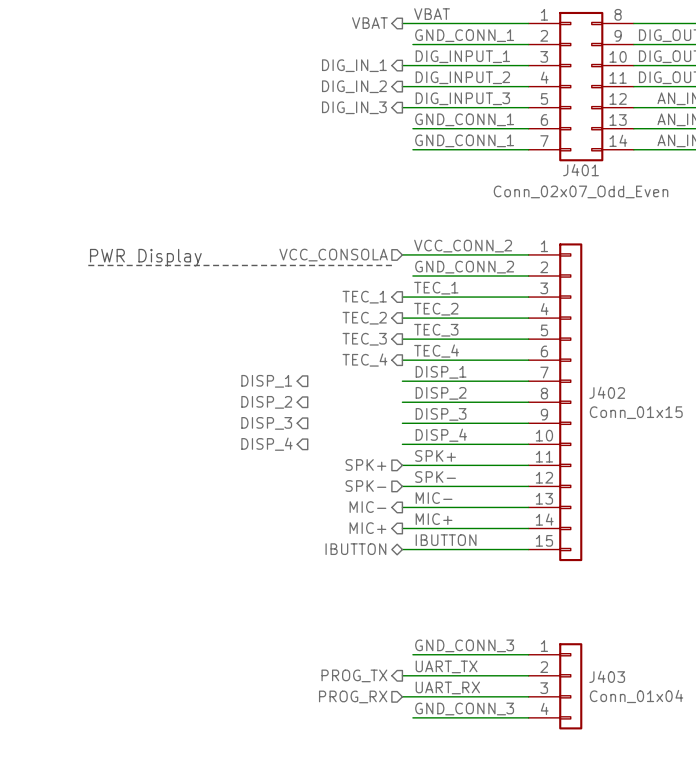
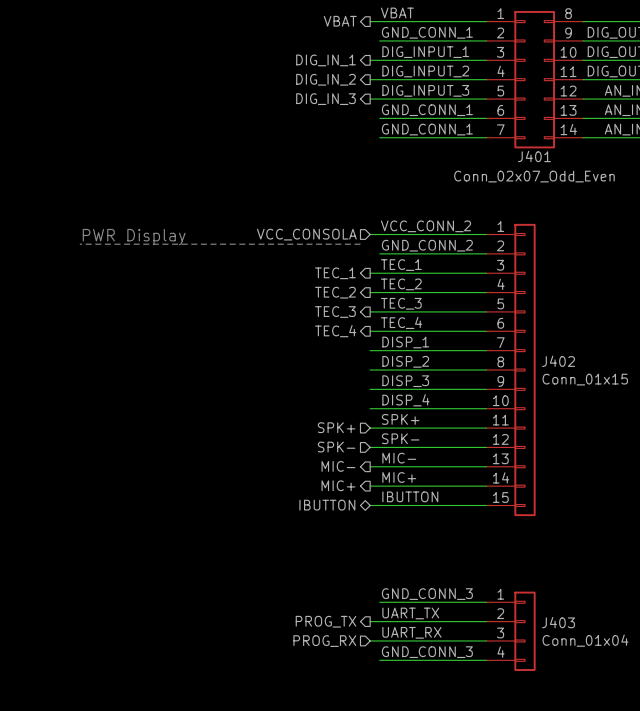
hierarchical label: DISP_1 (266, 381) -> none
hierarchical label: DISP_2 (266, 402) -> none
hierarchical label: DISP_3 (266, 423) -> none
hierarchical label: DISP_4 (266, 444) -> none

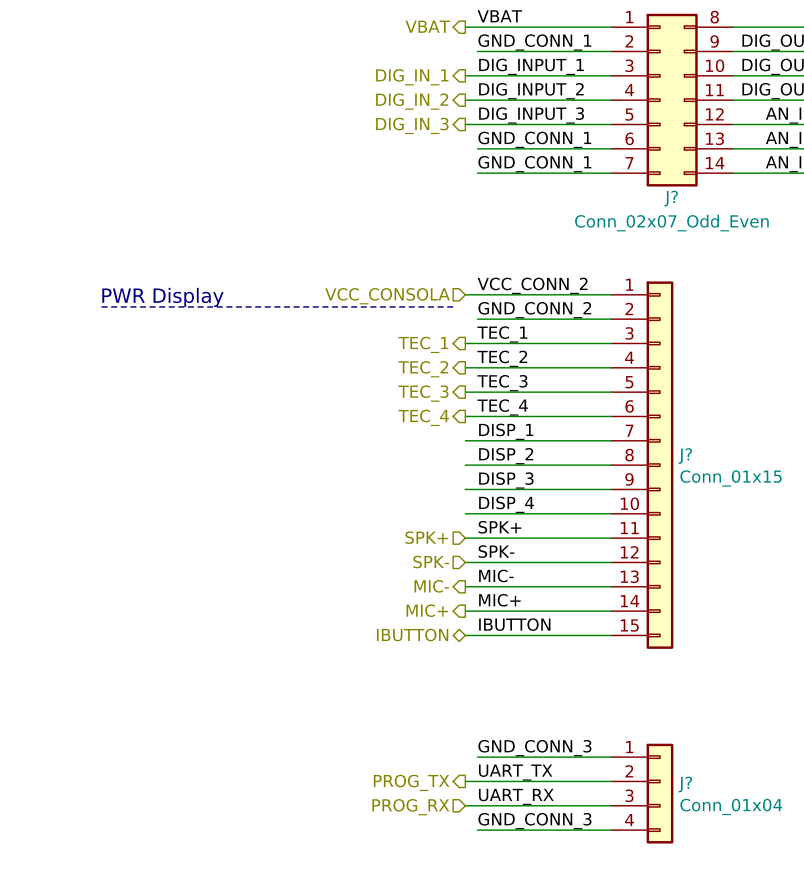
J401 name: J401 (534, 156) -> J? (671, 198)
J402 name: J402 (558, 361) -> J? (685, 456)
J403 name: J403 (558, 622) -> J? (685, 784)

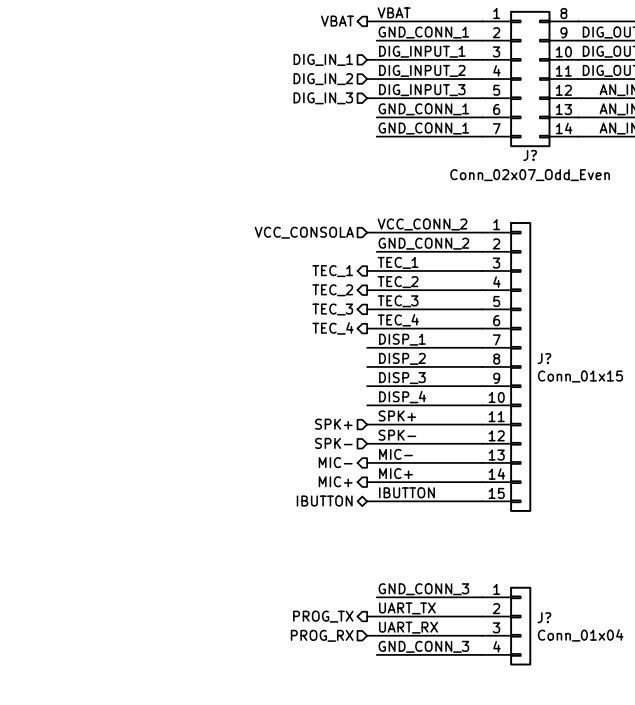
hierarchical label shape: output (412, 77) -> input (323, 59)
hierarchical label shape: output (412, 101) -> input (323, 79)
hierarchical label shape: output (412, 125) -> input (323, 98)
text: PWR Display (162, 297) -> none
line: (100, 306) (453, 306) -> none

